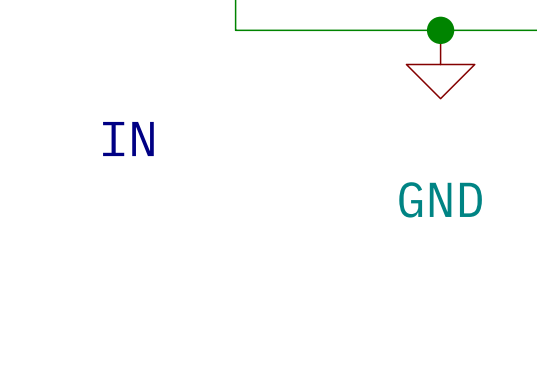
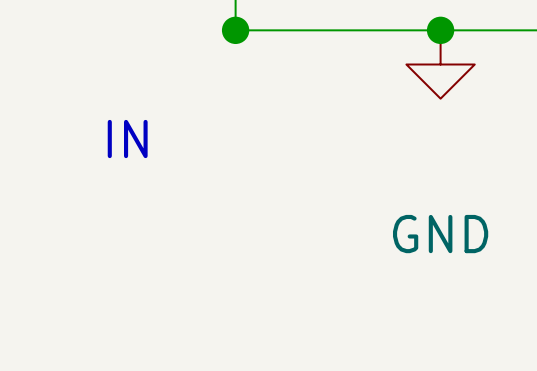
junction: none -> (235, 30)
power symbol text position: GND (440, 199) -> GND (440, 234)

